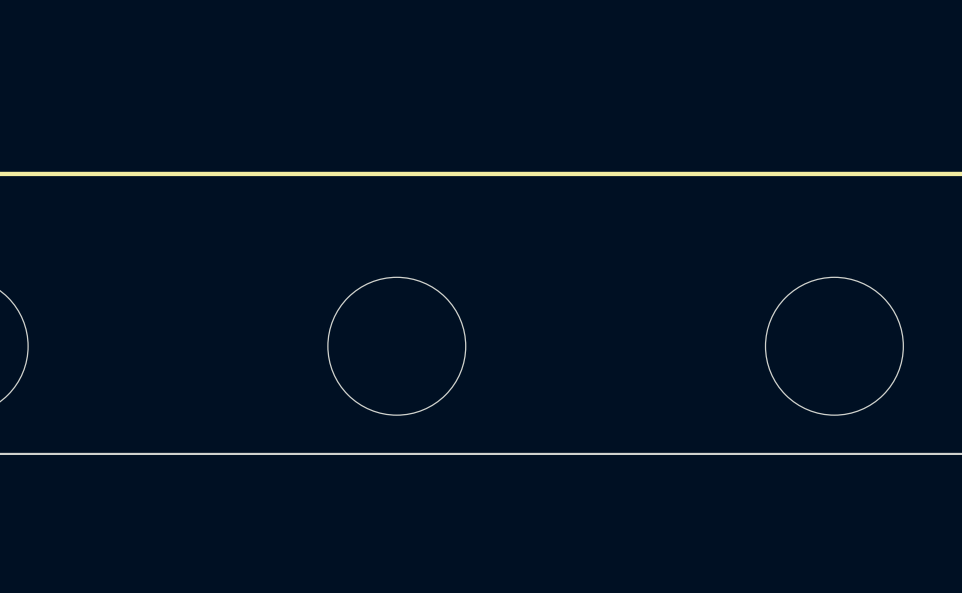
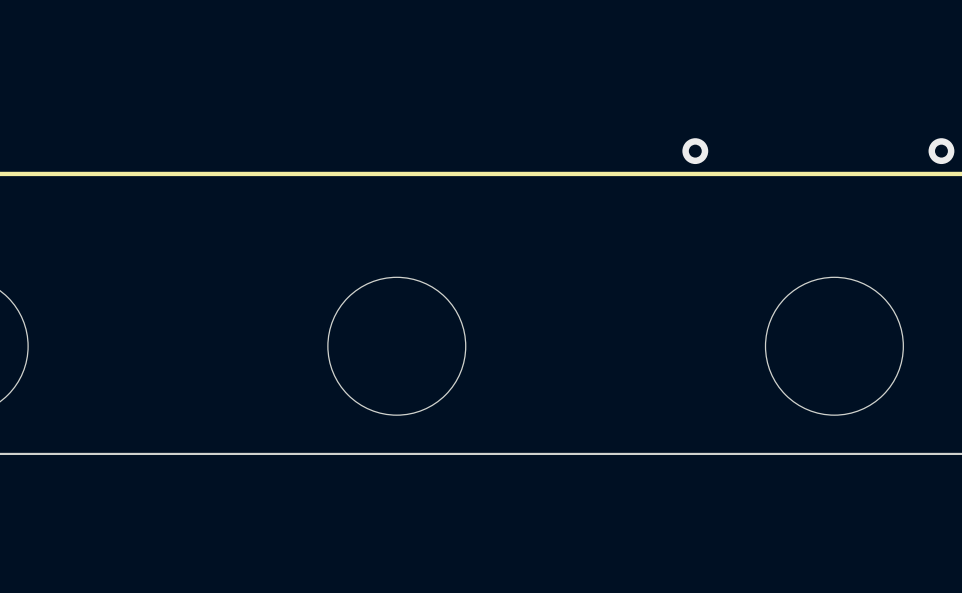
via: none -> (695, 151)
via: none -> (941, 151)

